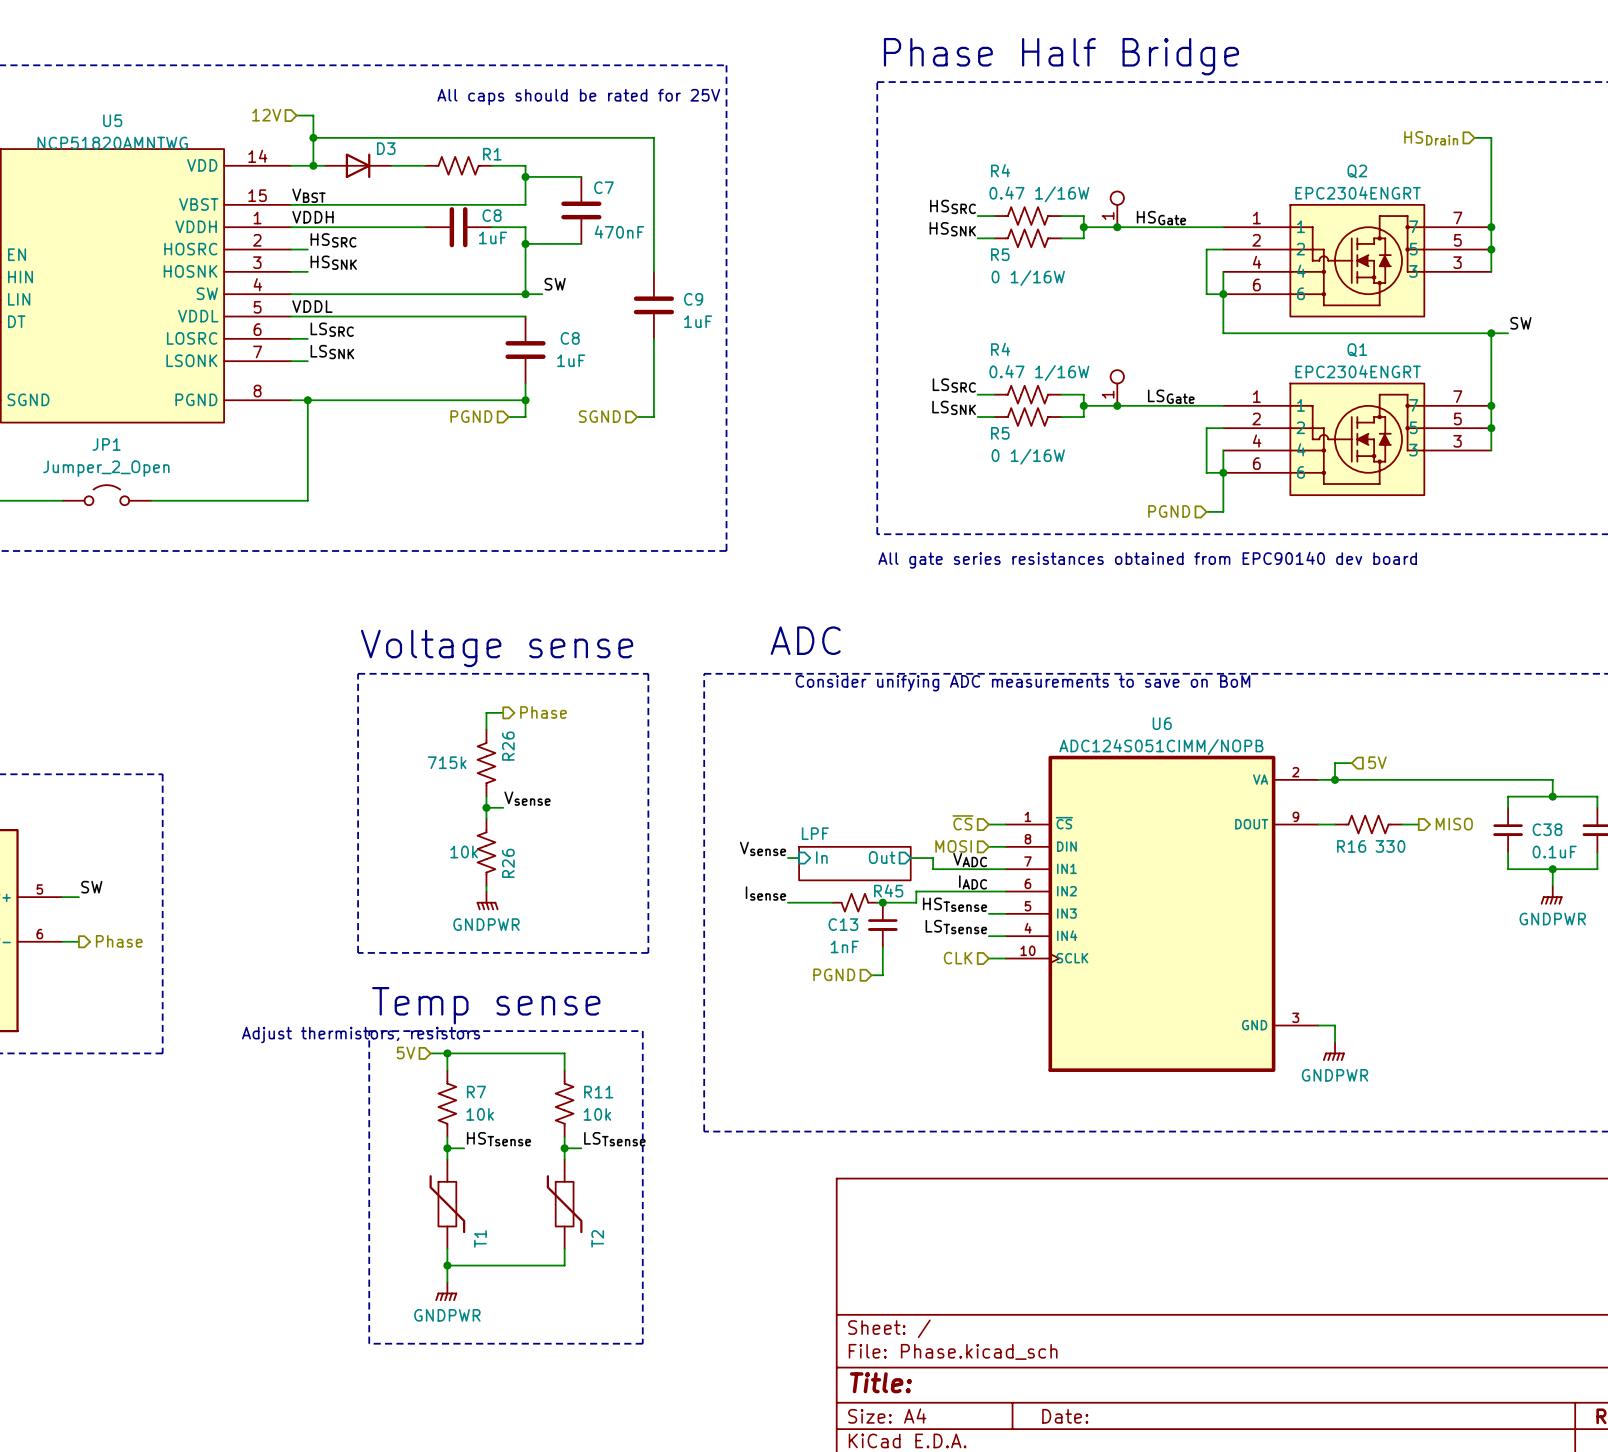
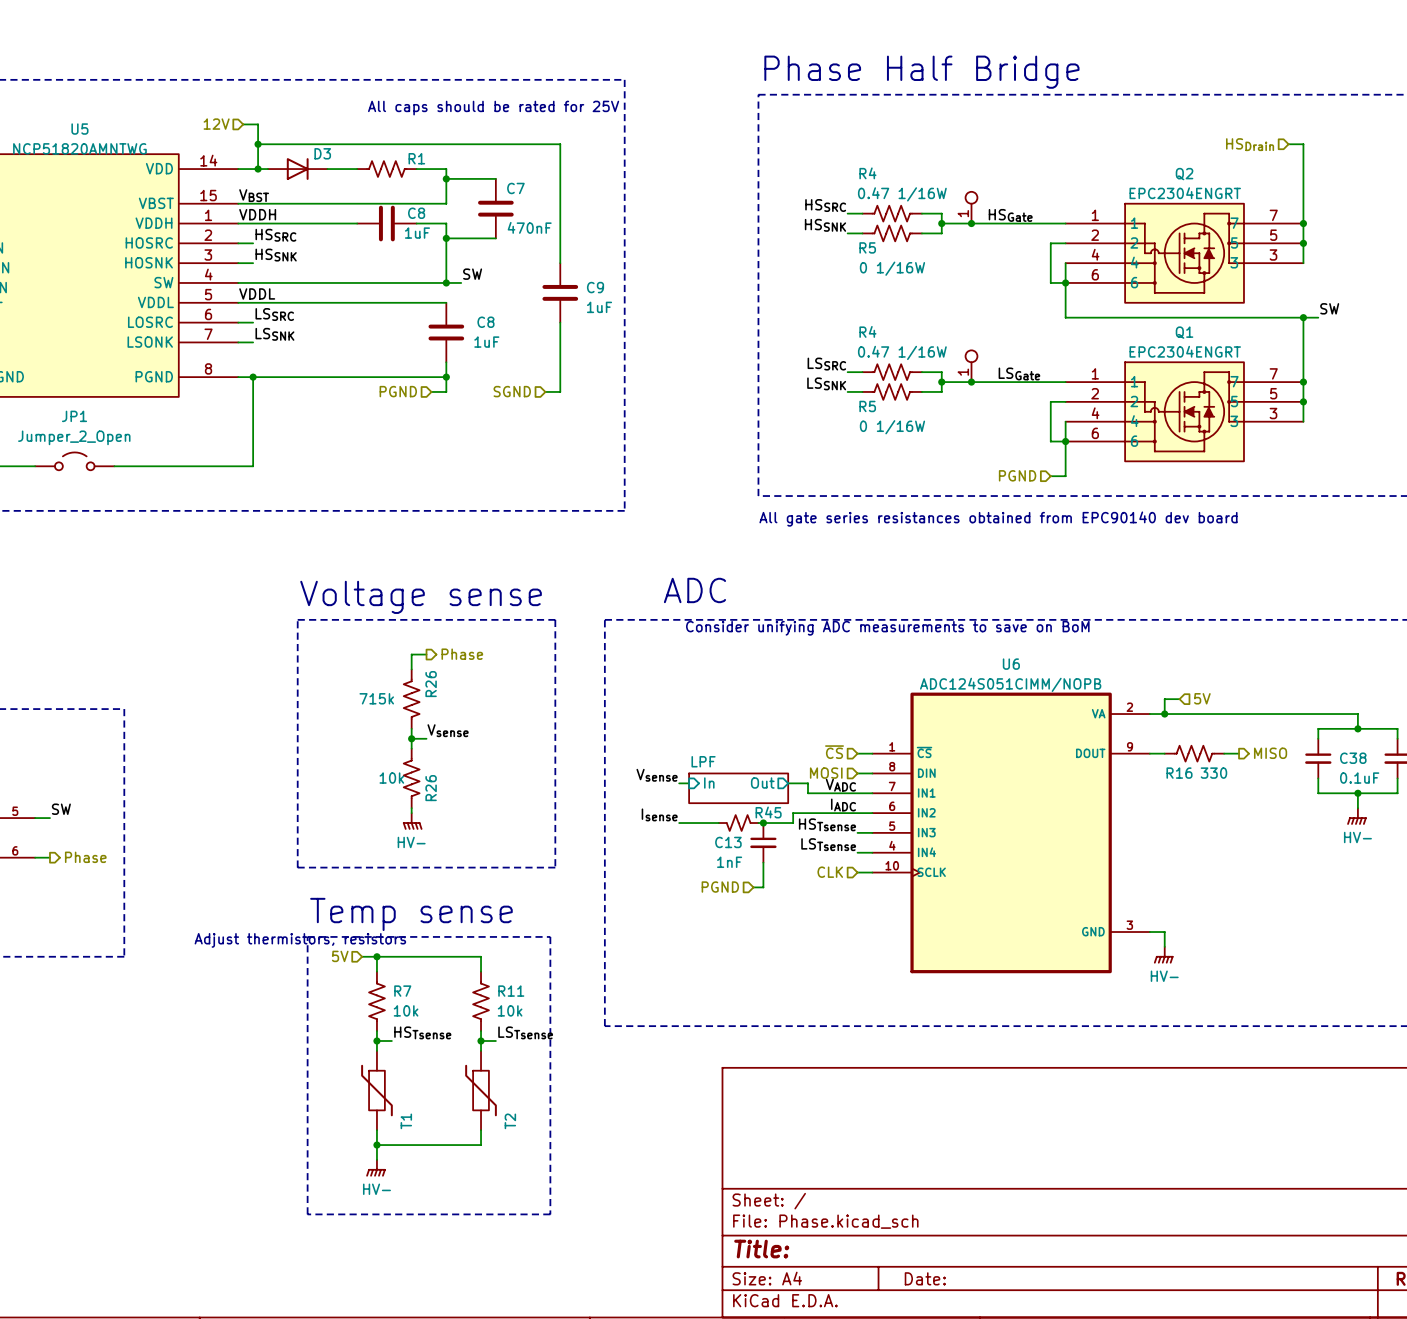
power symbol: GNDPWR (1551, 895) -> HV- (1356, 816)
power symbol: GNDPWR (487, 900) -> HV- (412, 821)
power symbol: GNDPWR (1333, 1051) -> HV- (1163, 955)
power symbol: GNDPWR (446, 1291) -> HV- (375, 1168)

